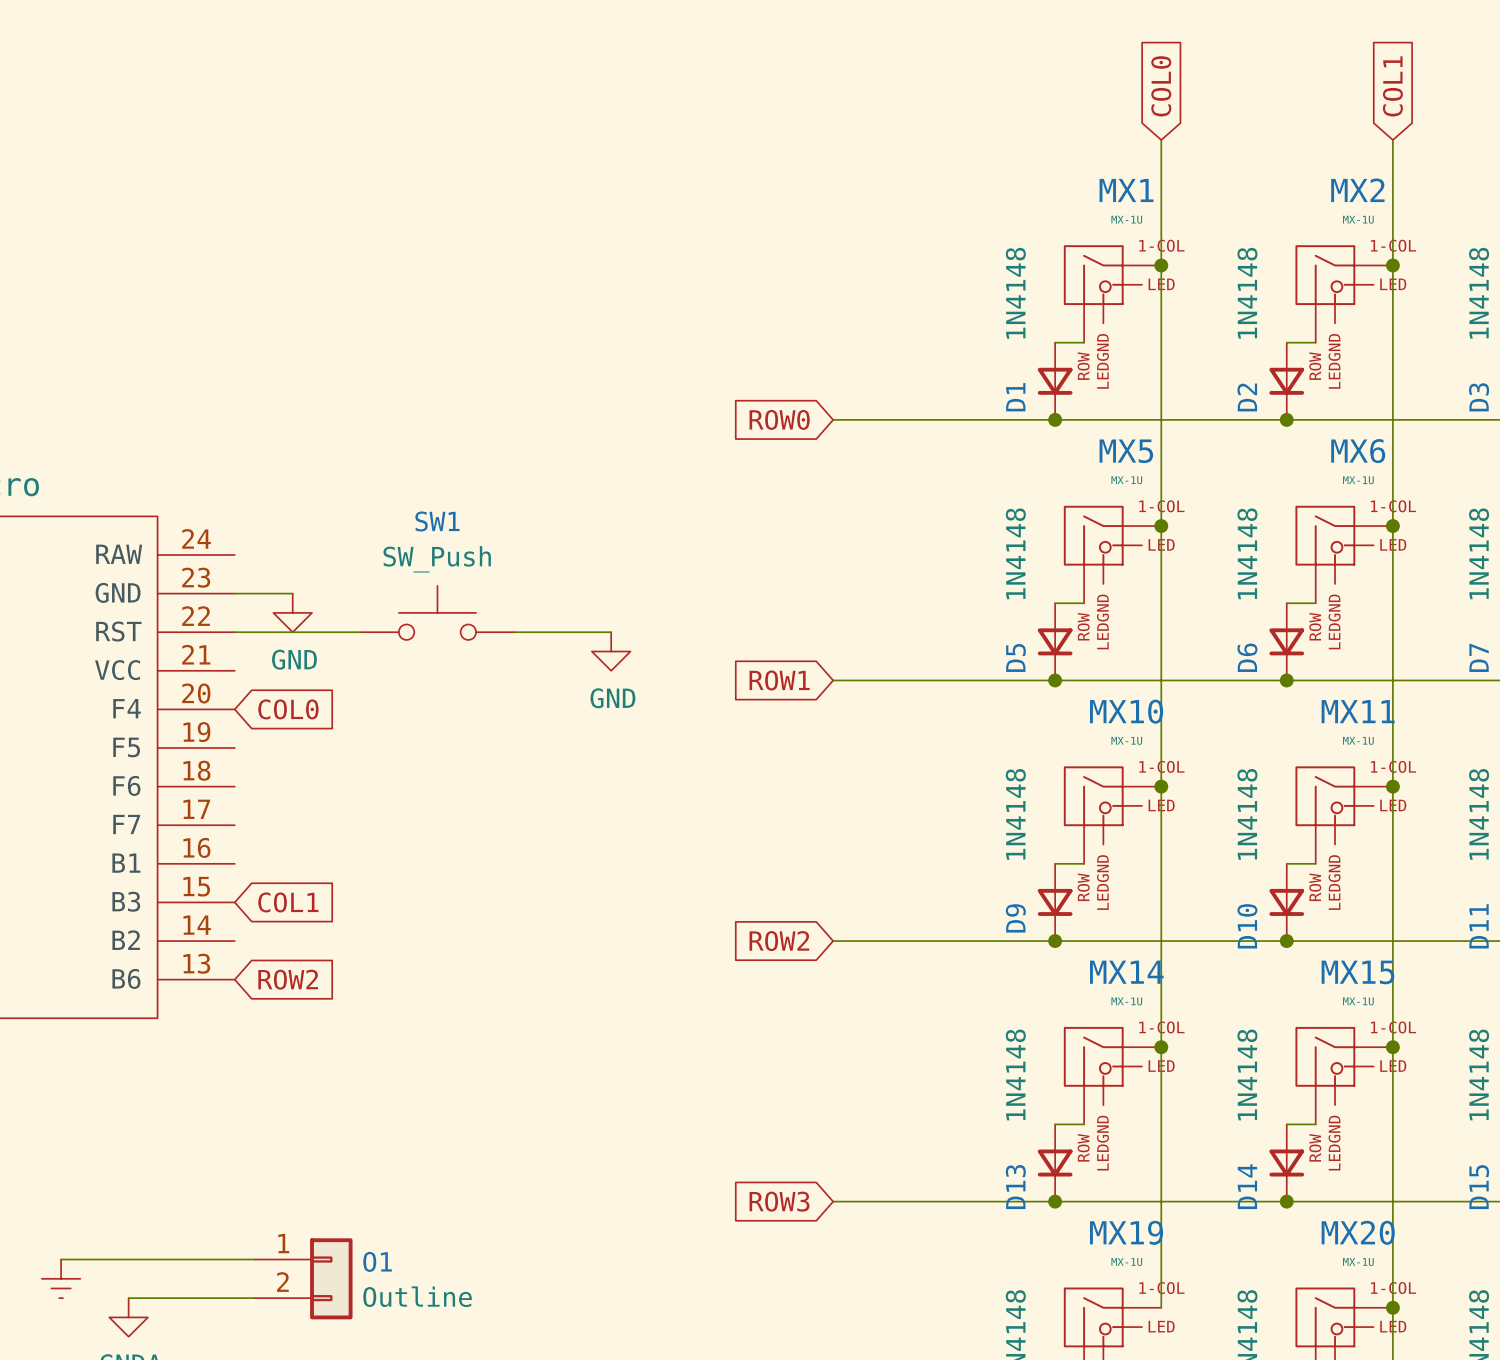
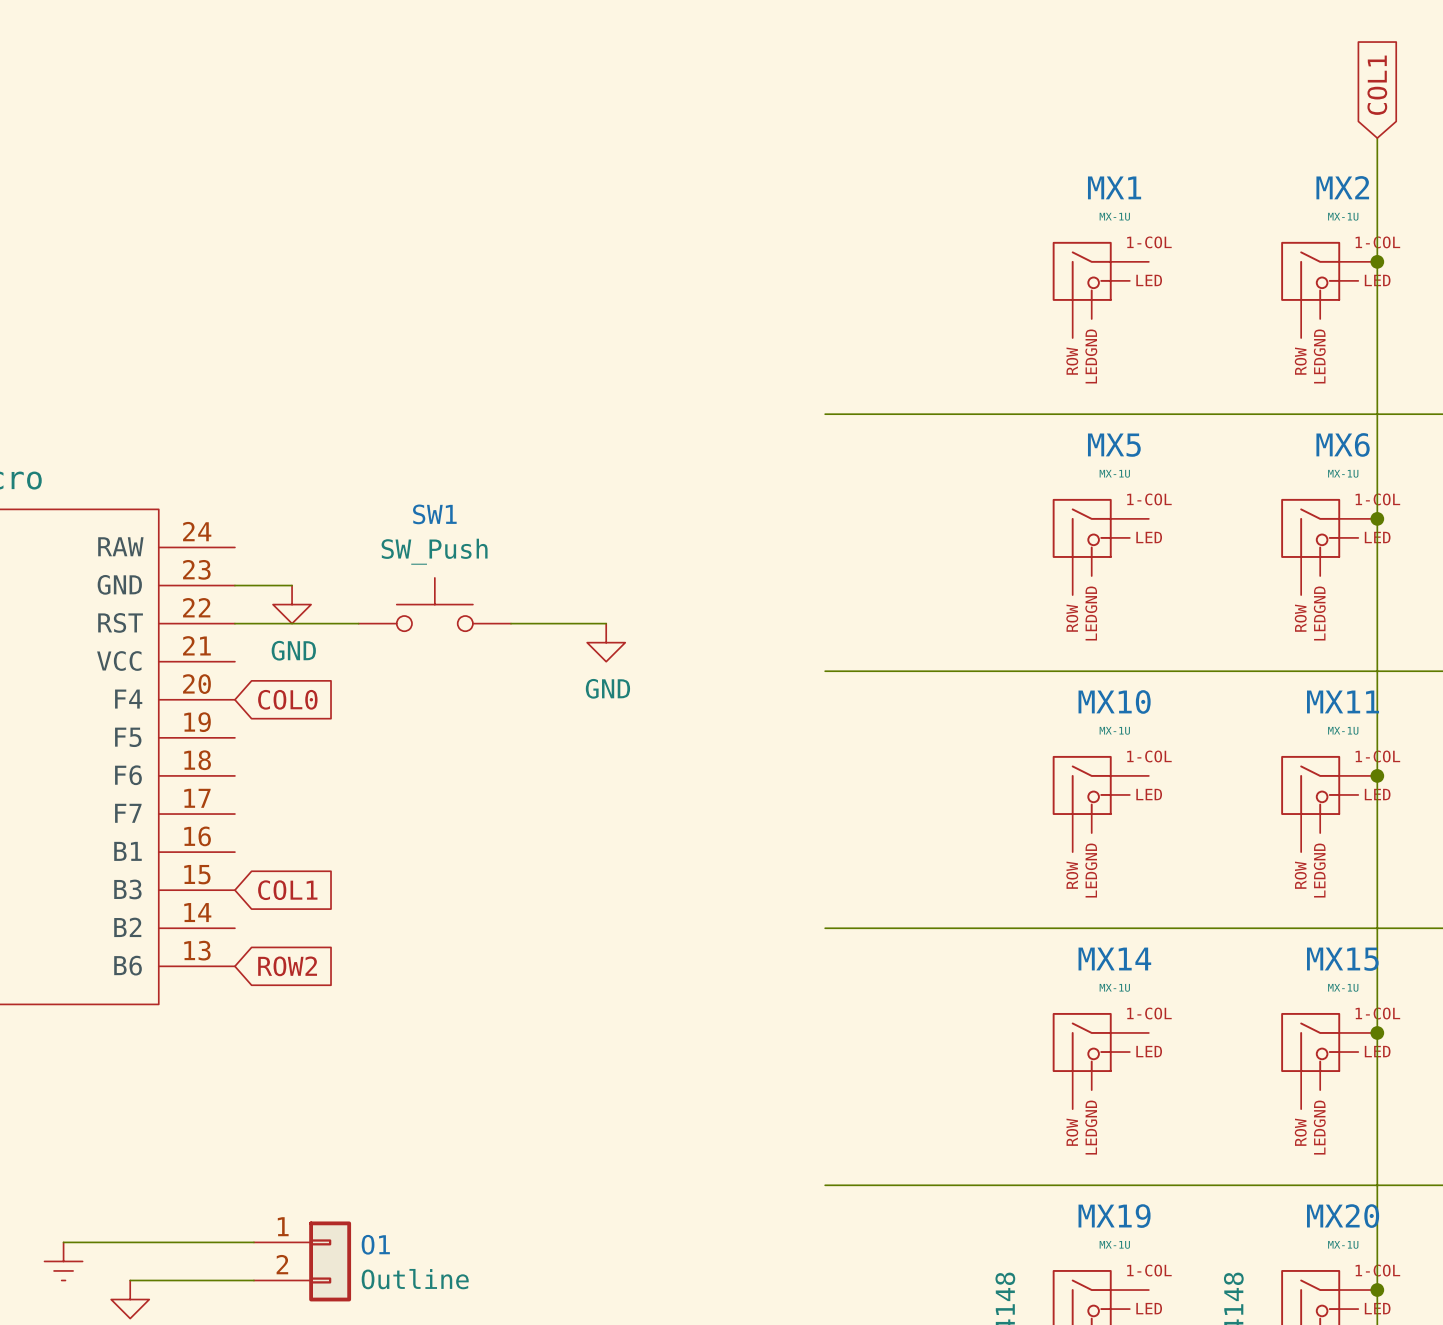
global label: COL0 (1161, 86) -> none
wire: (1161, 140) (1161, 1307) -> none
junction: (1161, 265) -> none
wire: (1055, 342) (1084, 342) -> none
wire: (1286, 342) (1315, 342) -> none
D1: 1N4148 (1055, 381) -> none
D2: 1N4148 (1286, 381) -> none
global label: ROW0 (779, 419) -> none
junction: (1055, 419) -> none
junction: (1286, 419) -> none
junction: (1161, 526) -> none
wire: (1055, 603) (1084, 603) -> none
wire: (1286, 603) (1315, 603) -> none
D5: 1N4148 (1055, 641) -> none
D6: 1N4148 (1286, 641) -> none
global label: ROW1 (779, 680) -> none
junction: (1055, 680) -> none
junction: (1286, 680) -> none
junction: (1161, 786) -> none
wire: (1055, 863) (1084, 863) -> none
wire: (1286, 863) (1315, 863) -> none
D9: 1N4148 (1055, 902) -> none
D10: 1N4148 (1286, 902) -> none
global label: ROW2 (779, 941) -> none
junction: (1055, 941) -> none
junction: (1286, 941) -> none
junction: (1161, 1047) -> none
wire: (1055, 1124) (1084, 1124) -> none
wire: (1286, 1124) (1315, 1124) -> none
D13: 1N4148 (1055, 1163) -> none
D14: 1N4148 (1286, 1163) -> none
global label: ROW3 (779, 1201) -> none
junction: (1055, 1201) -> none
junction: (1286, 1201) -> none

